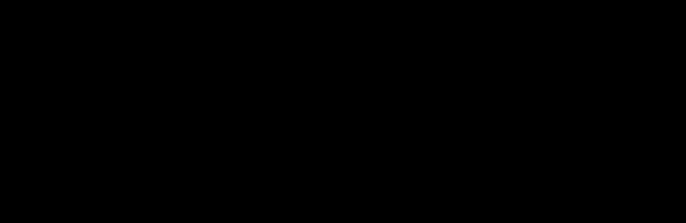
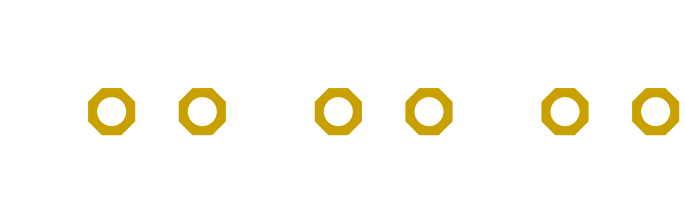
part: none -> (156, 111)
part: none -> (383, 111)
part: none -> (610, 111)

